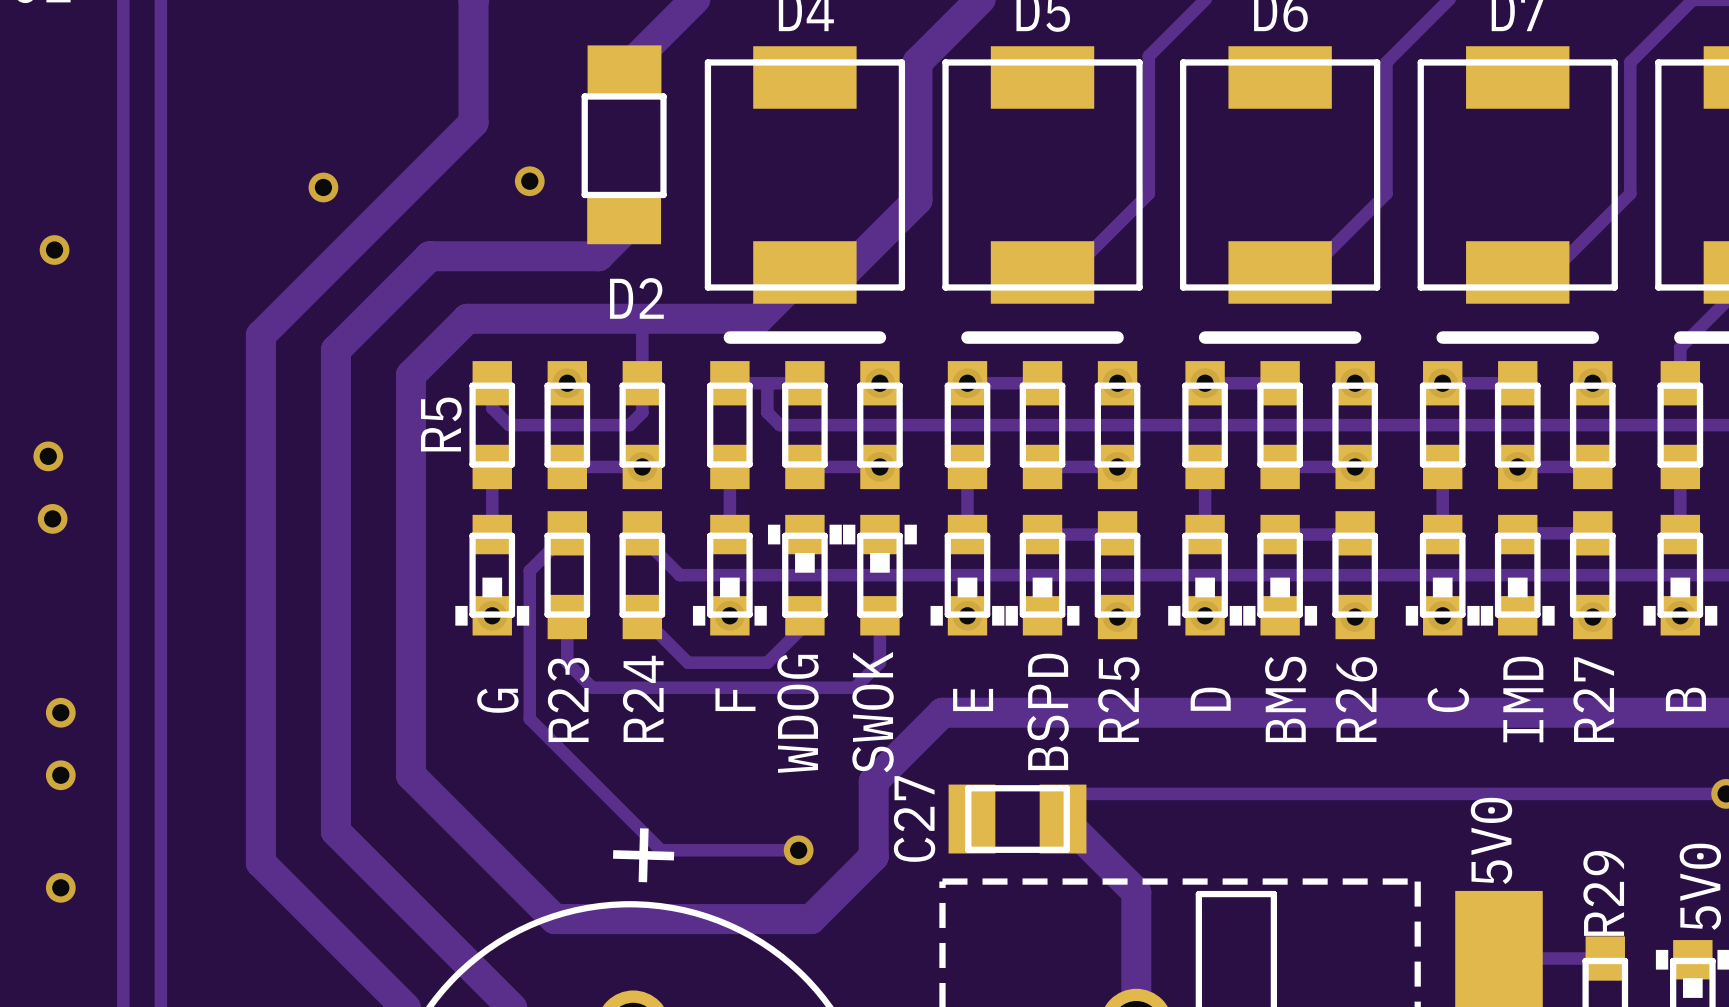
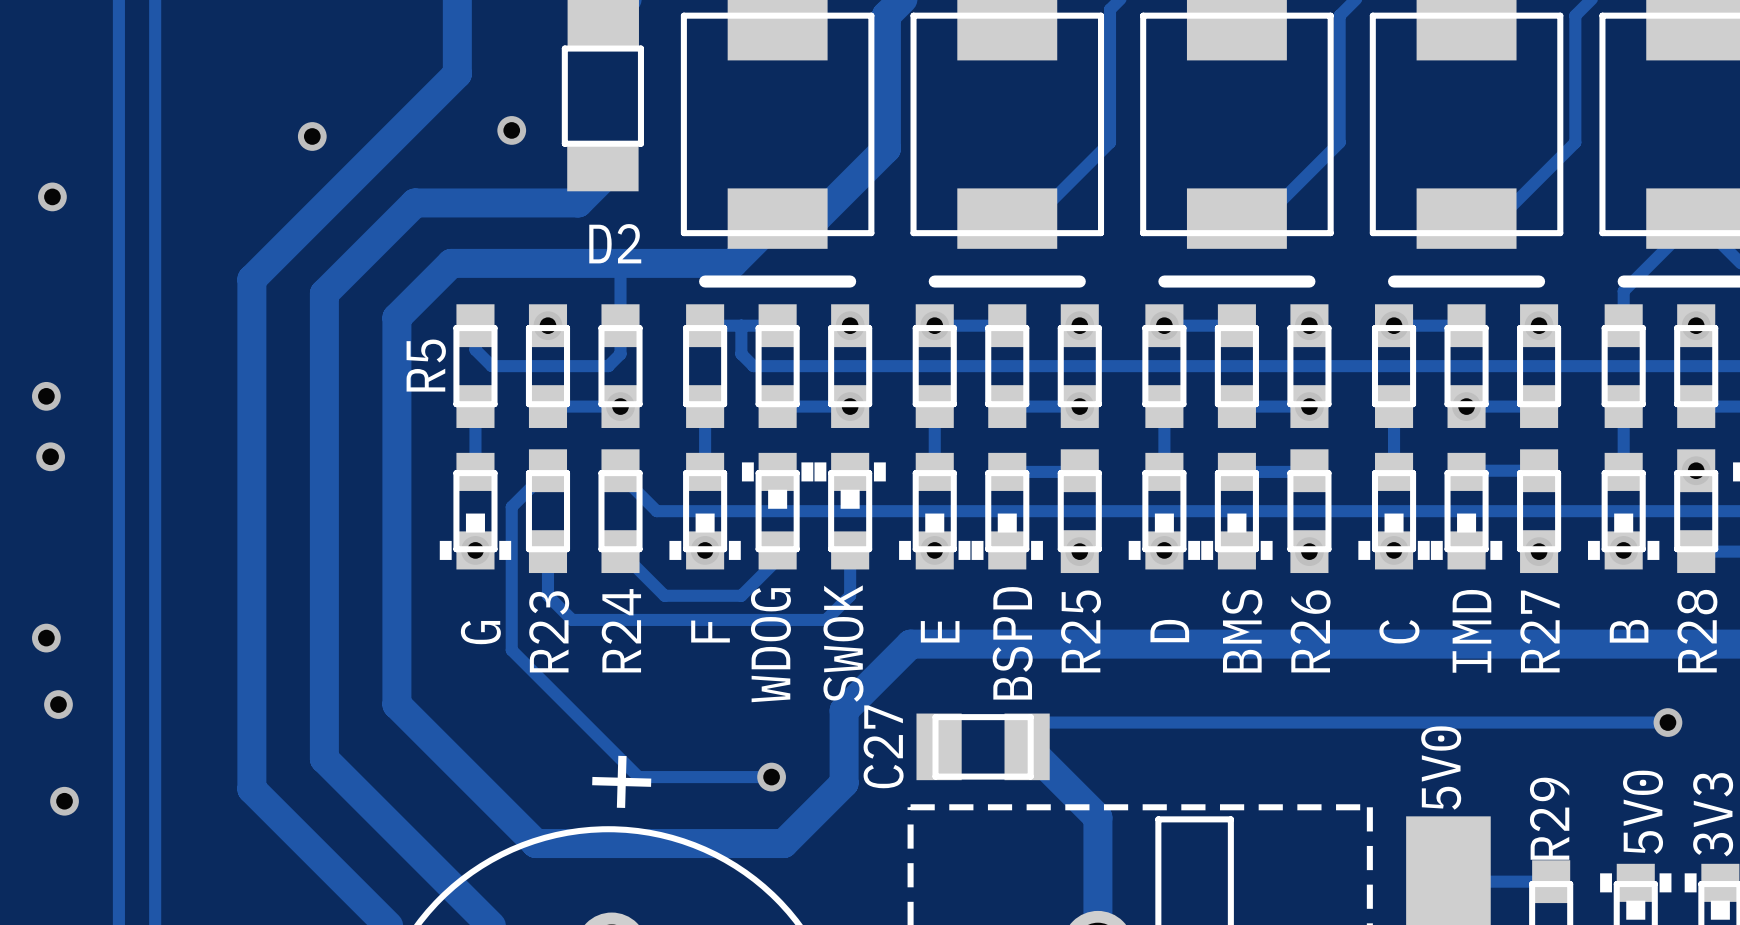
via position: (60, 712) -> (46, 638)
via position: (60, 887) -> (64, 801)

